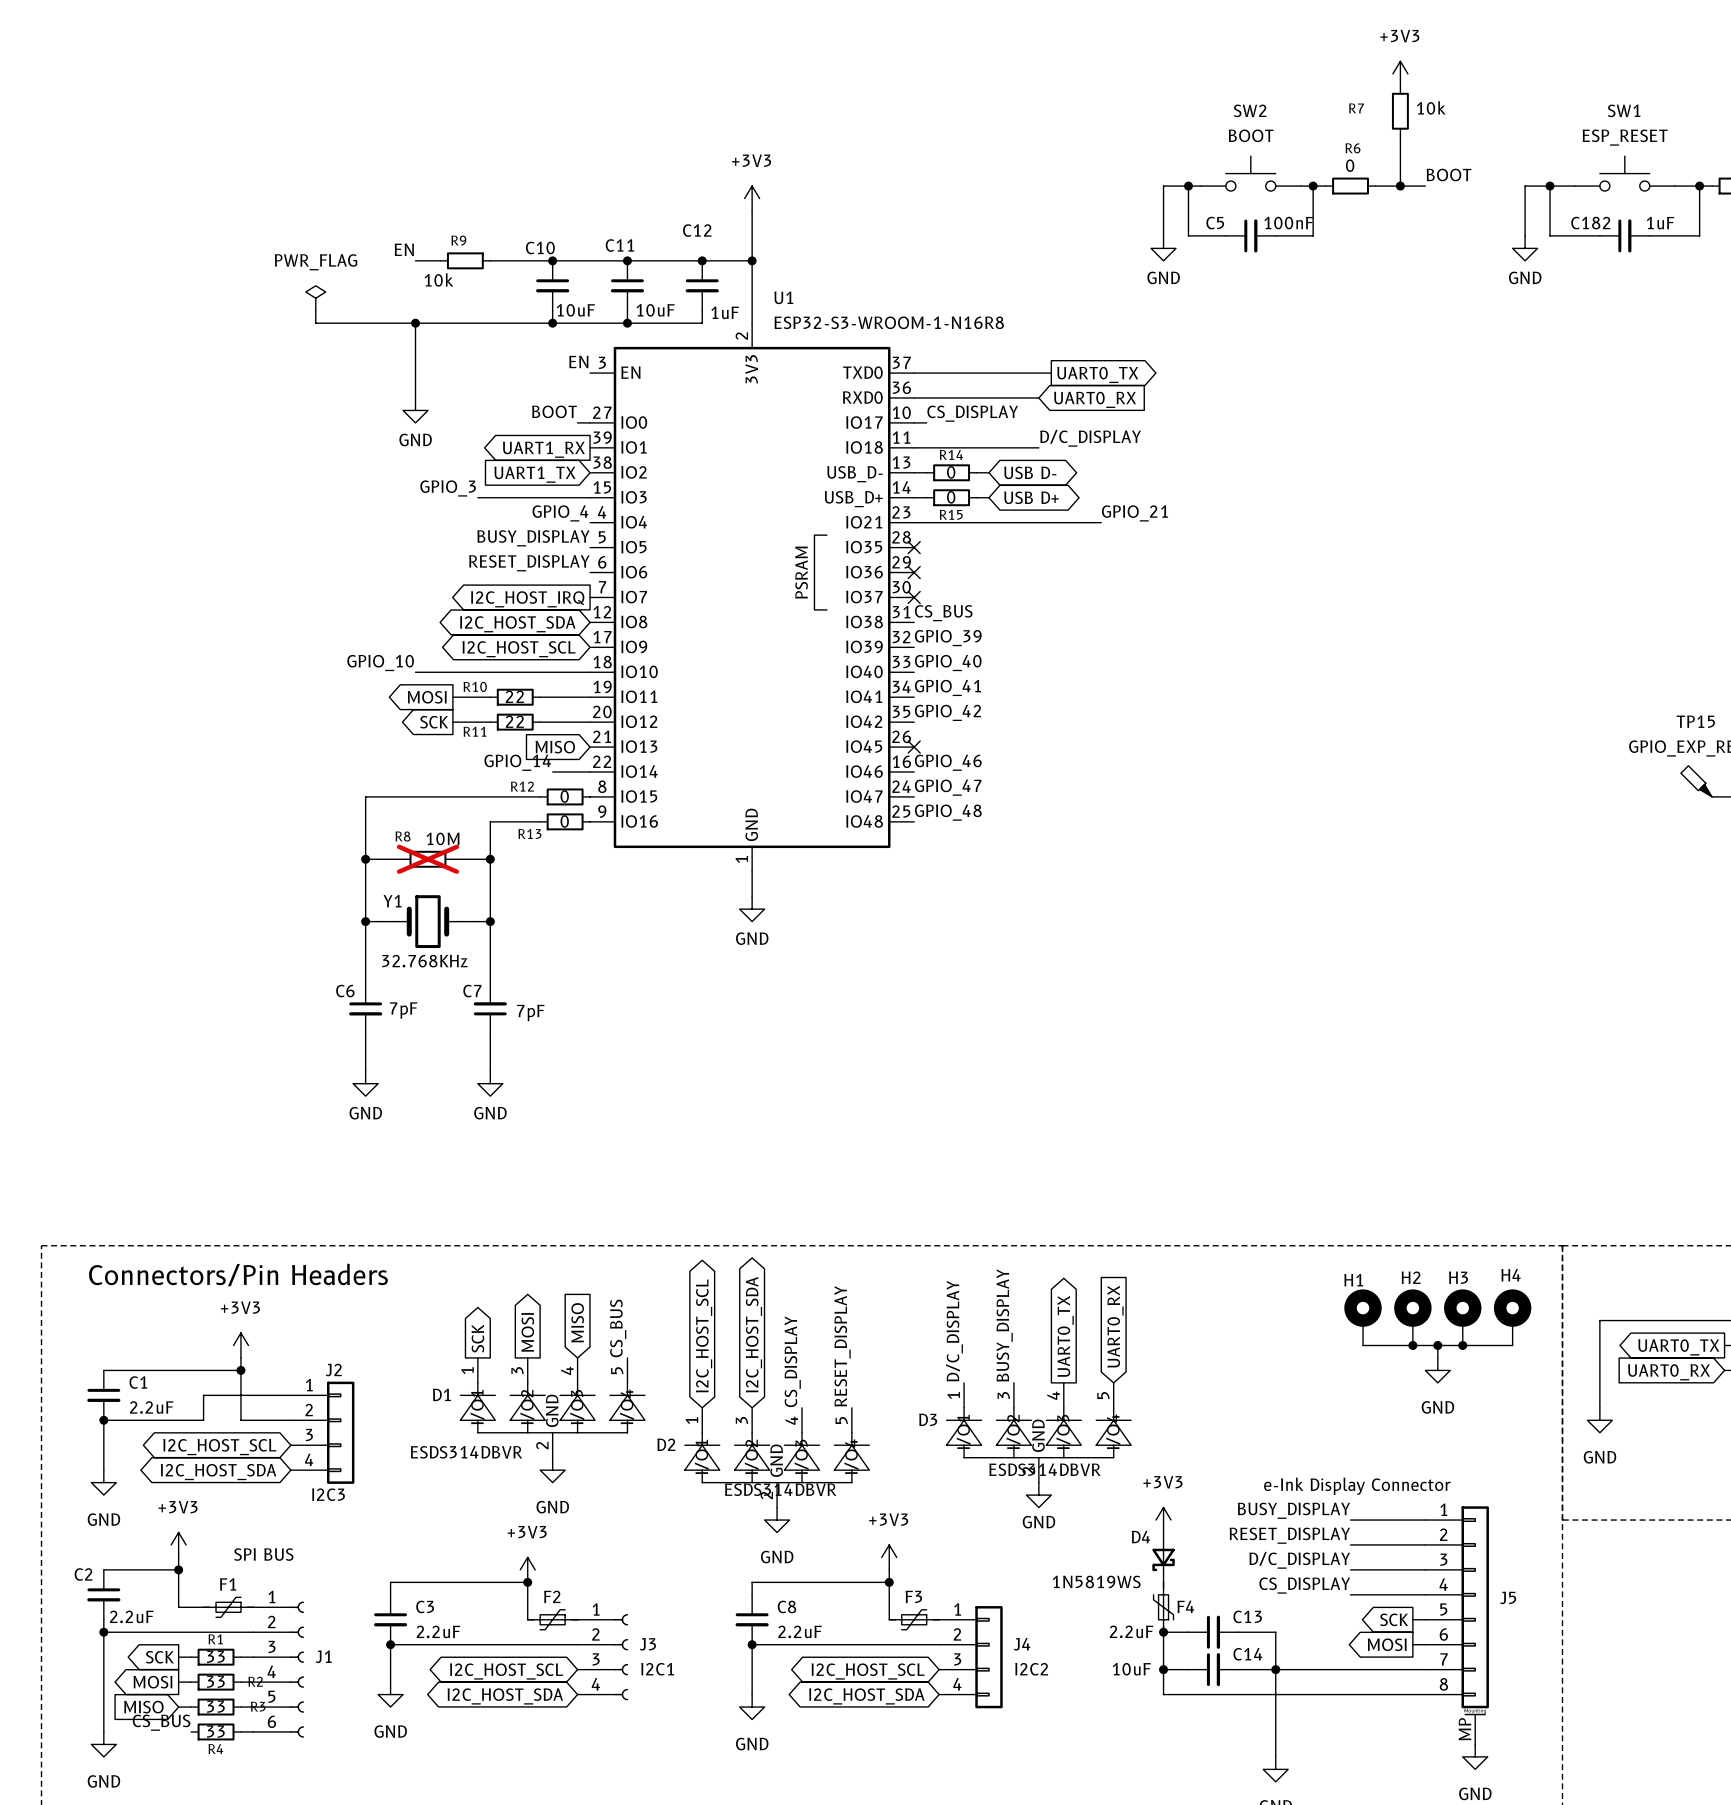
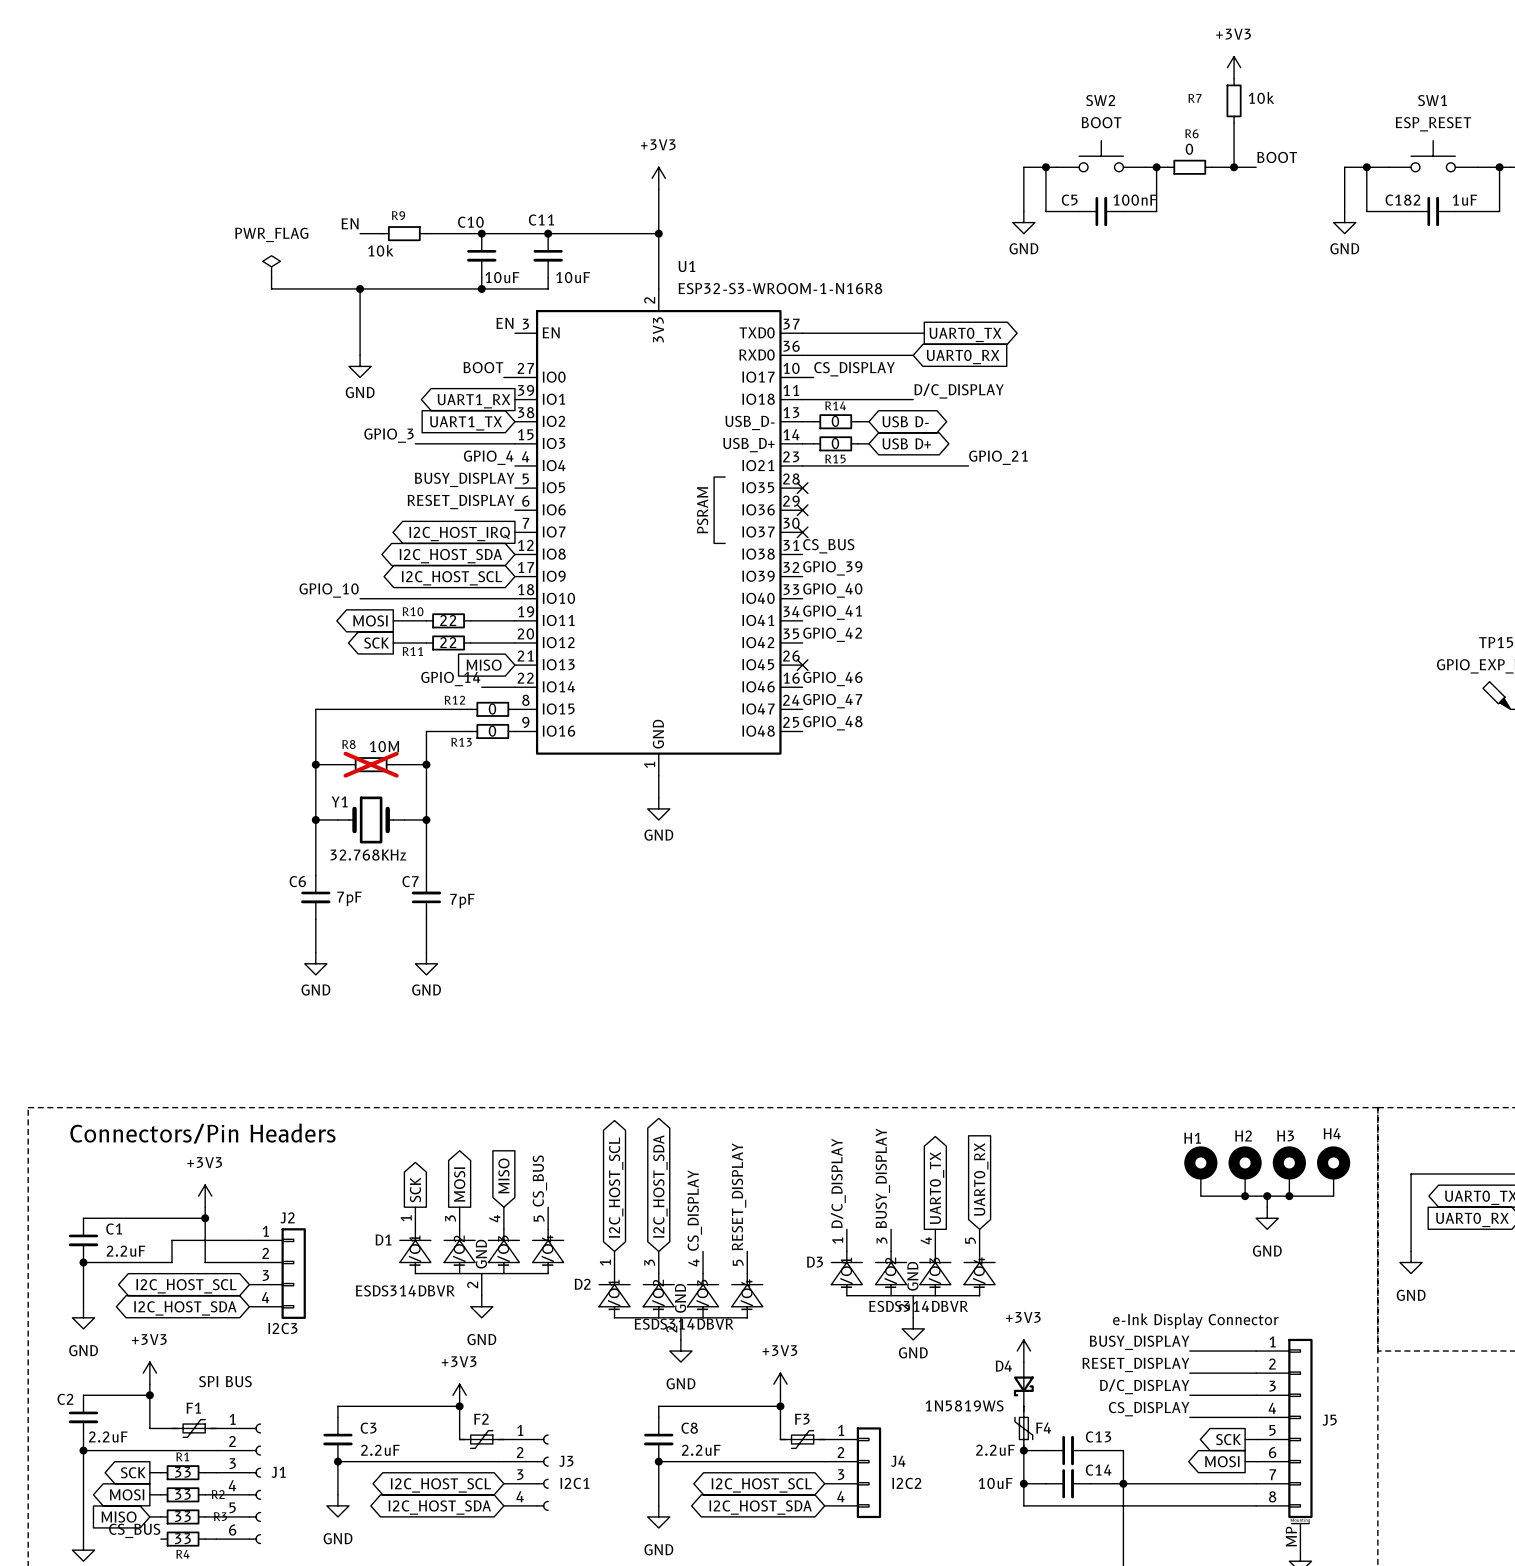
junction: (702, 260) -> none
C12: 1uF (702, 285) -> none
wire: (702, 310) (702, 323) (627, 323) -> none
junction: (627, 323) -> none

